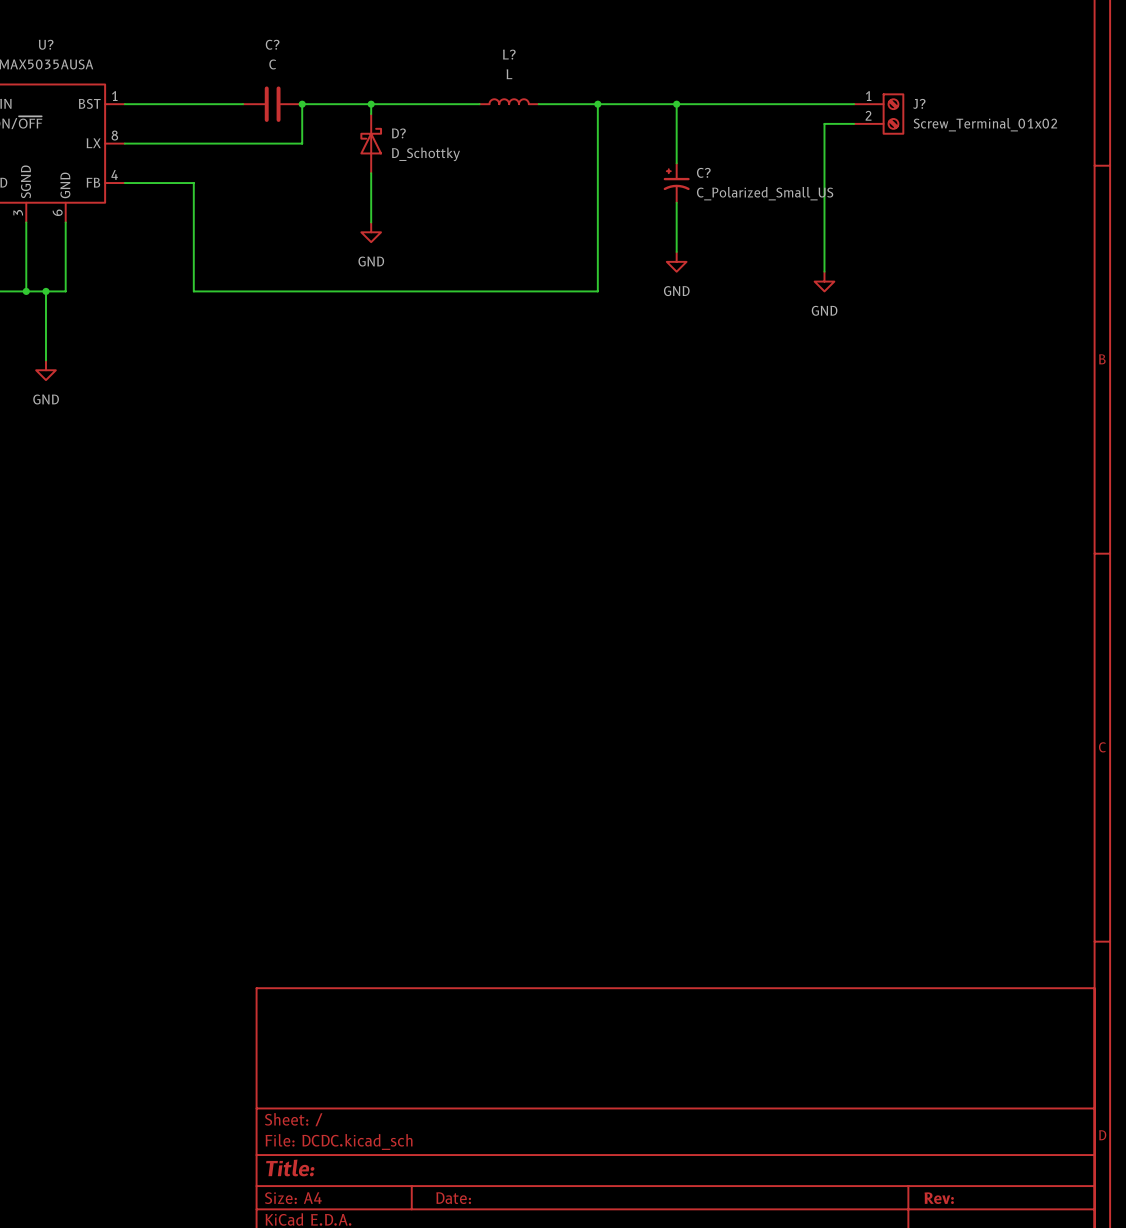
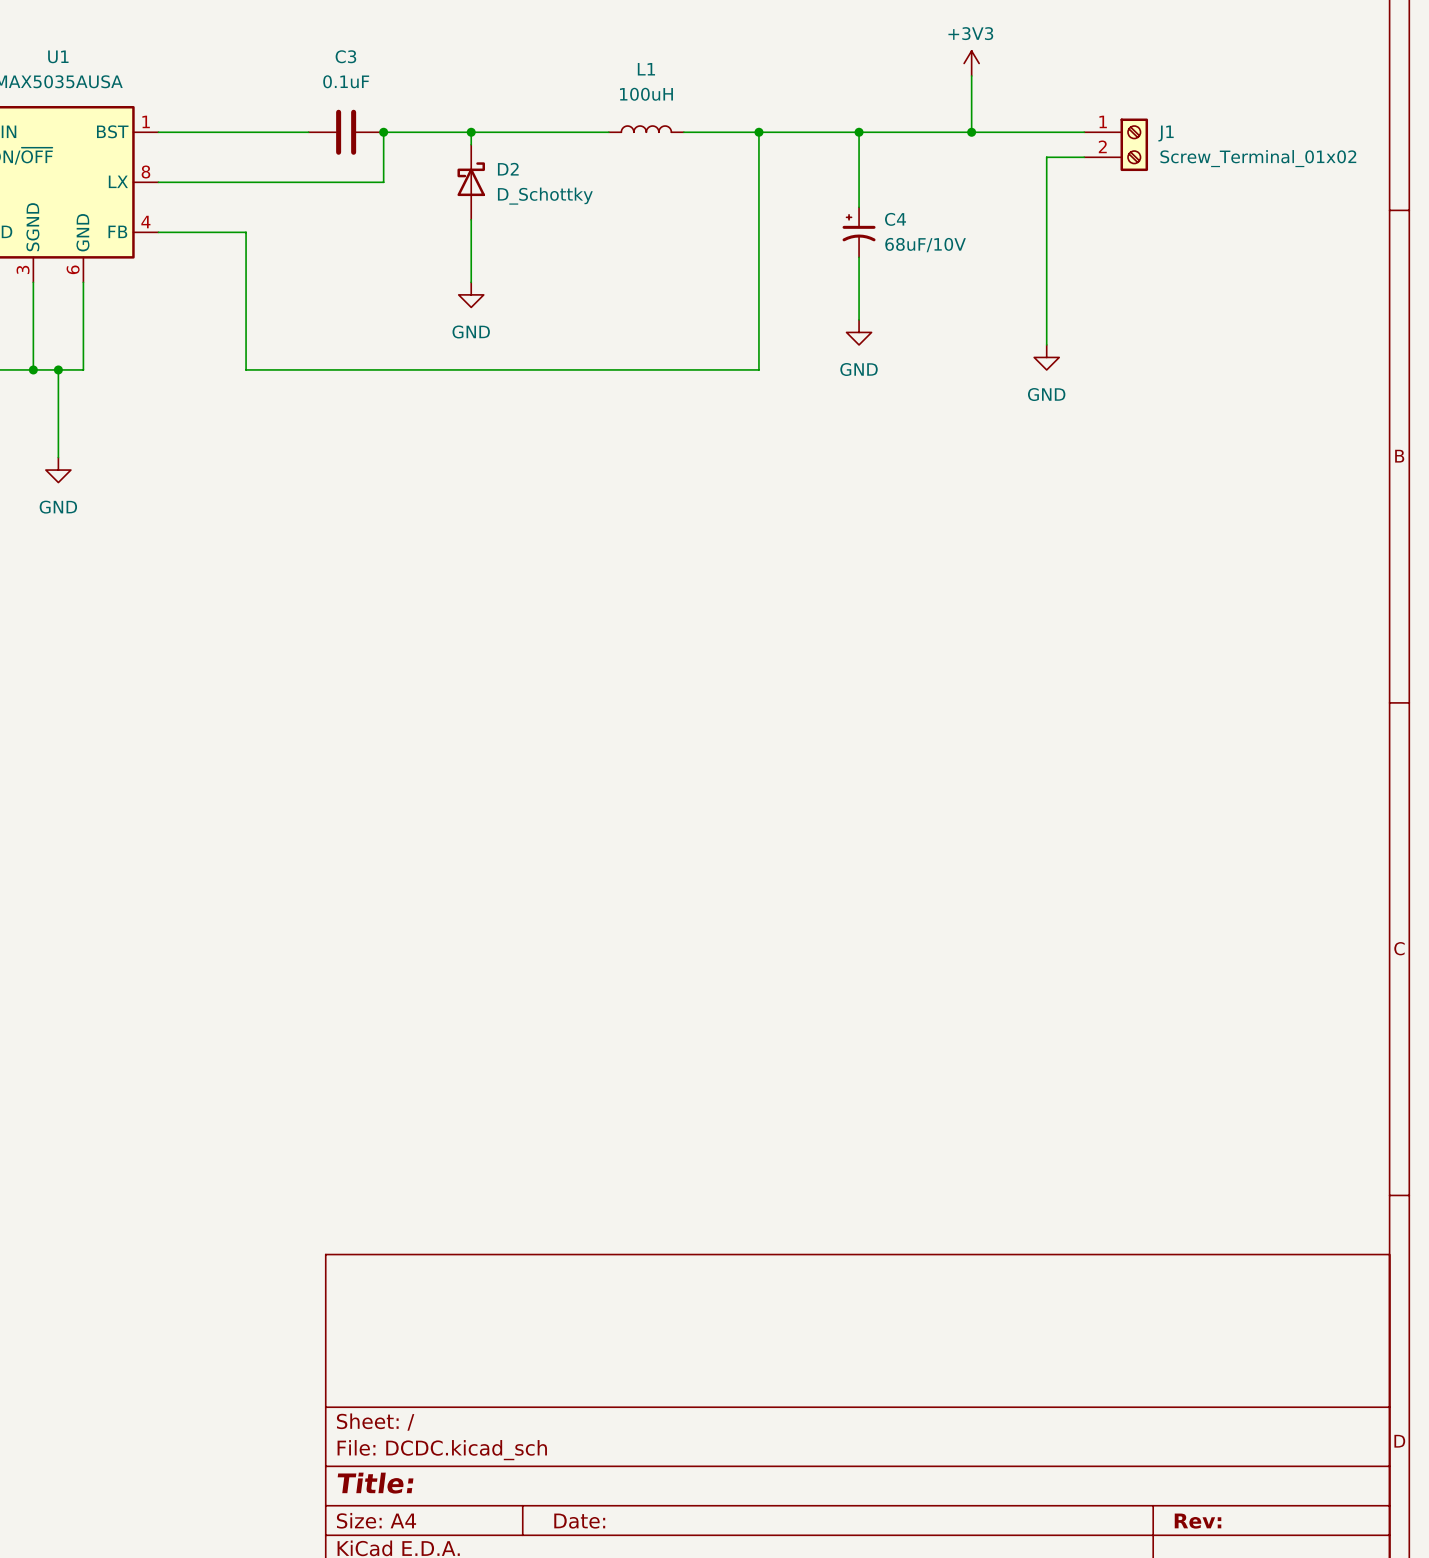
U? name: U? (46, 44) -> U1 (58, 56)
C? name: C? (272, 44) -> C3 (345, 56)
power symbol: none -> +3V3 (971, 63)
L? name: L? (509, 54) -> L1 (646, 69)
wire: none -> (971, 75) (971, 132)
C? value: C (272, 64) -> 0.1uF (346, 81)
L? value: L (509, 74) -> 100uH (646, 94)
J? name: J? (919, 103) -> J1 (1166, 133)
junction: none -> (971, 132)
D? name: D? (398, 133) -> D2 (508, 169)
C? name: C? (703, 172) -> C4 (895, 219)
C? value: C_Polarized_Small_US (765, 193) -> 68uF/10V (925, 245)

